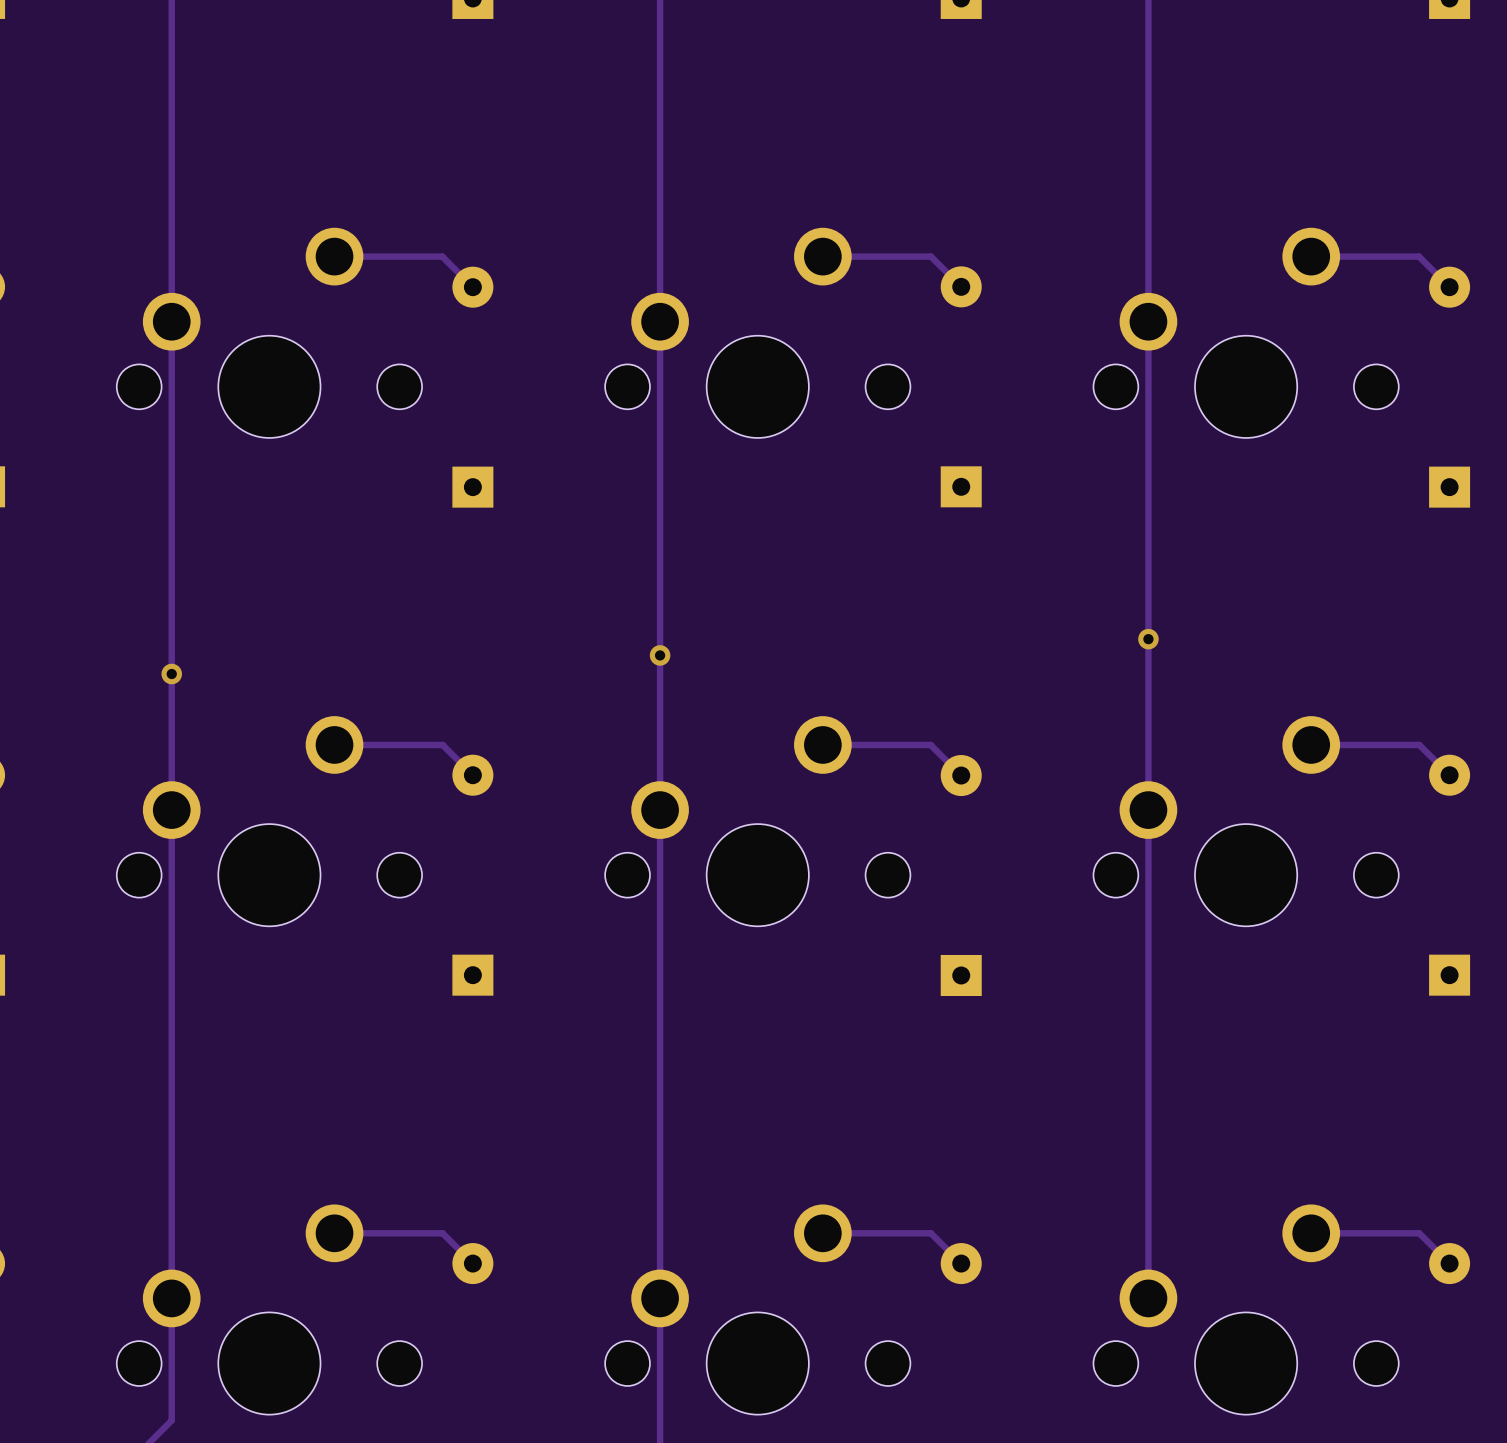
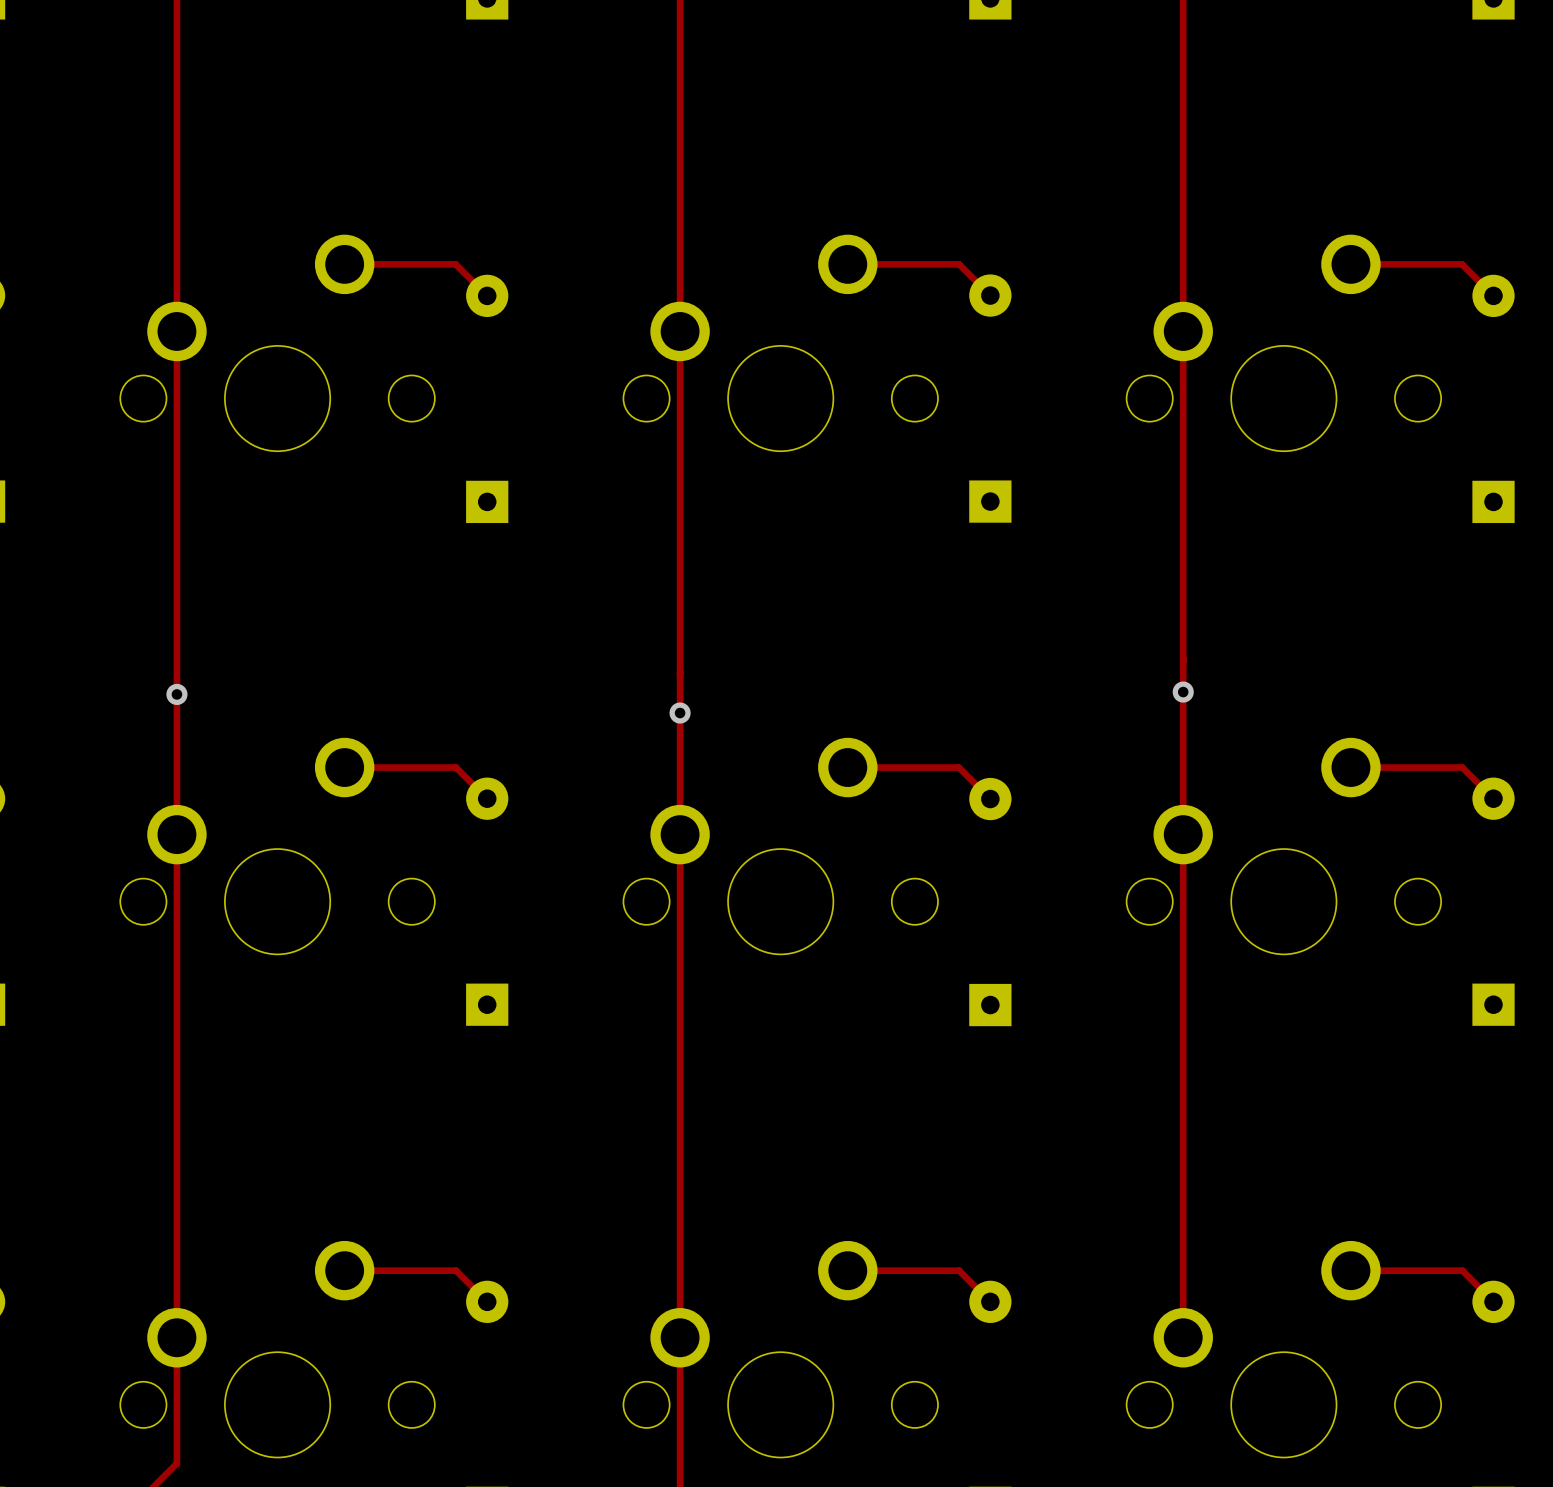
via position: (1148, 639) -> (1183, 692)
via position: (660, 655) -> (680, 713)

